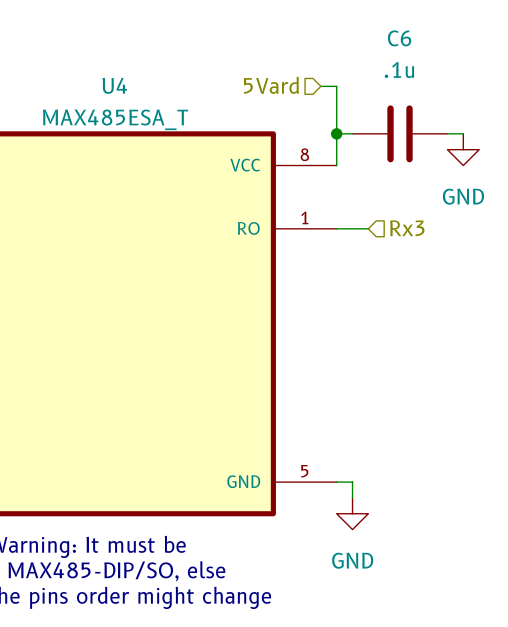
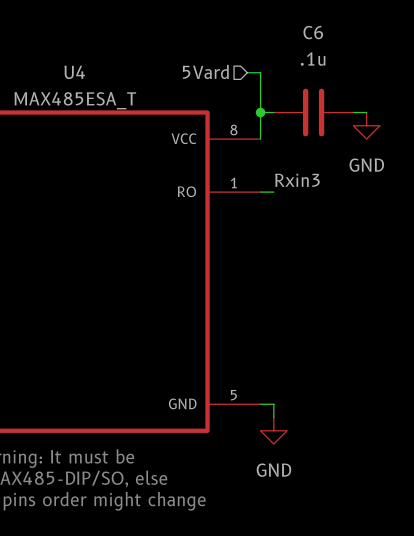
label: none -> Rxin3 (297, 180)
wire: (352, 228) (368, 228) -> none
hierarchical label: Rx3 (407, 228) -> none

